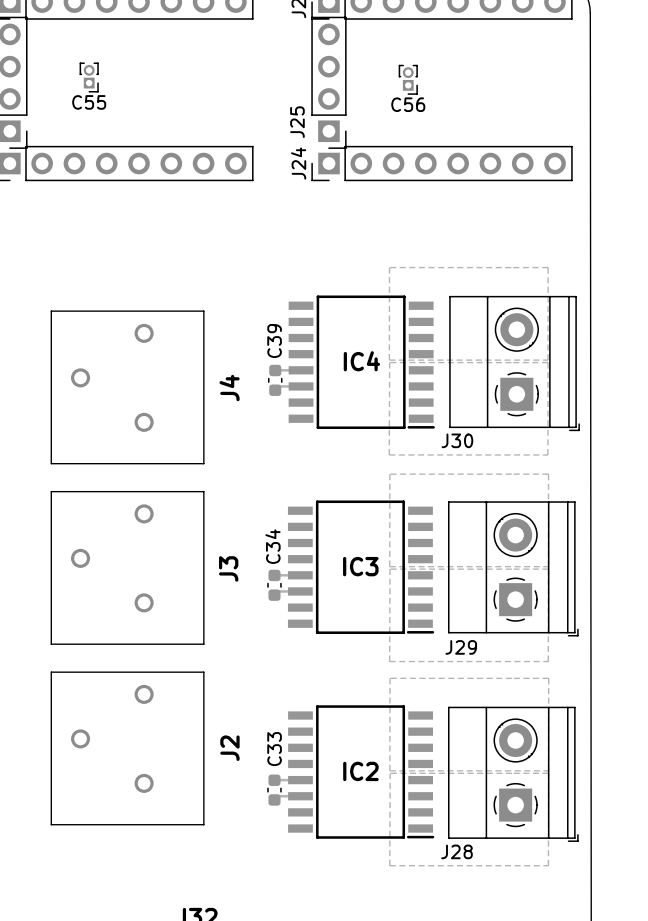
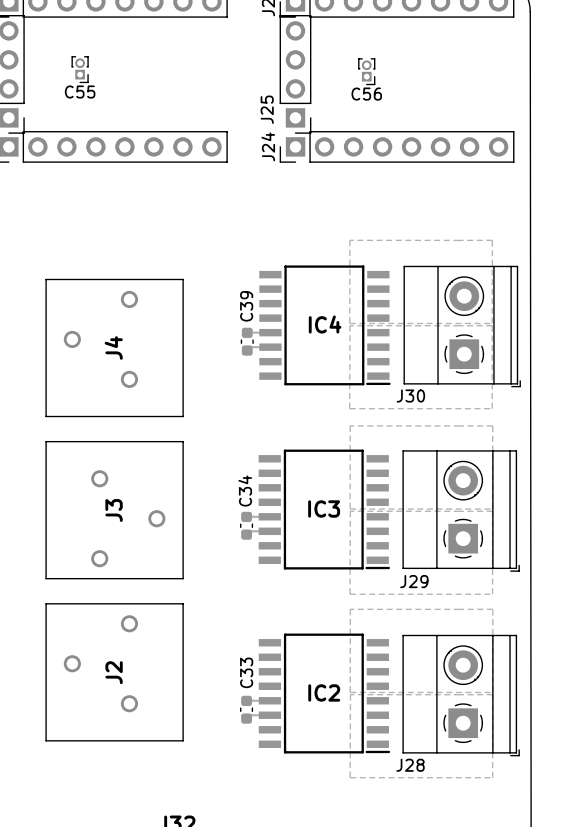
J4 name position: J4 (229, 388) -> J4 (113, 348)
J3 rotation: 0° (127, 567) -> 180° (114, 510)
J3 name position: J3 (228, 568) -> J3 (114, 510)
J2 name position: J2 (229, 748) -> J2 (114, 672)

